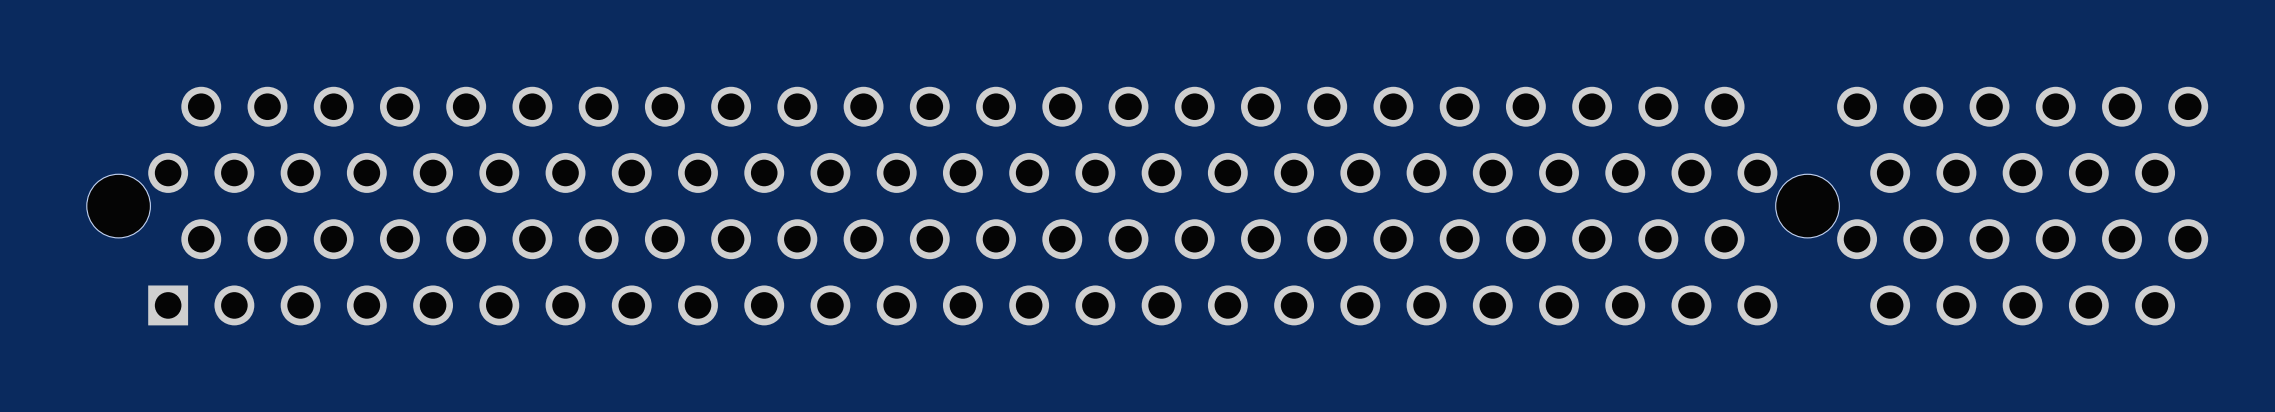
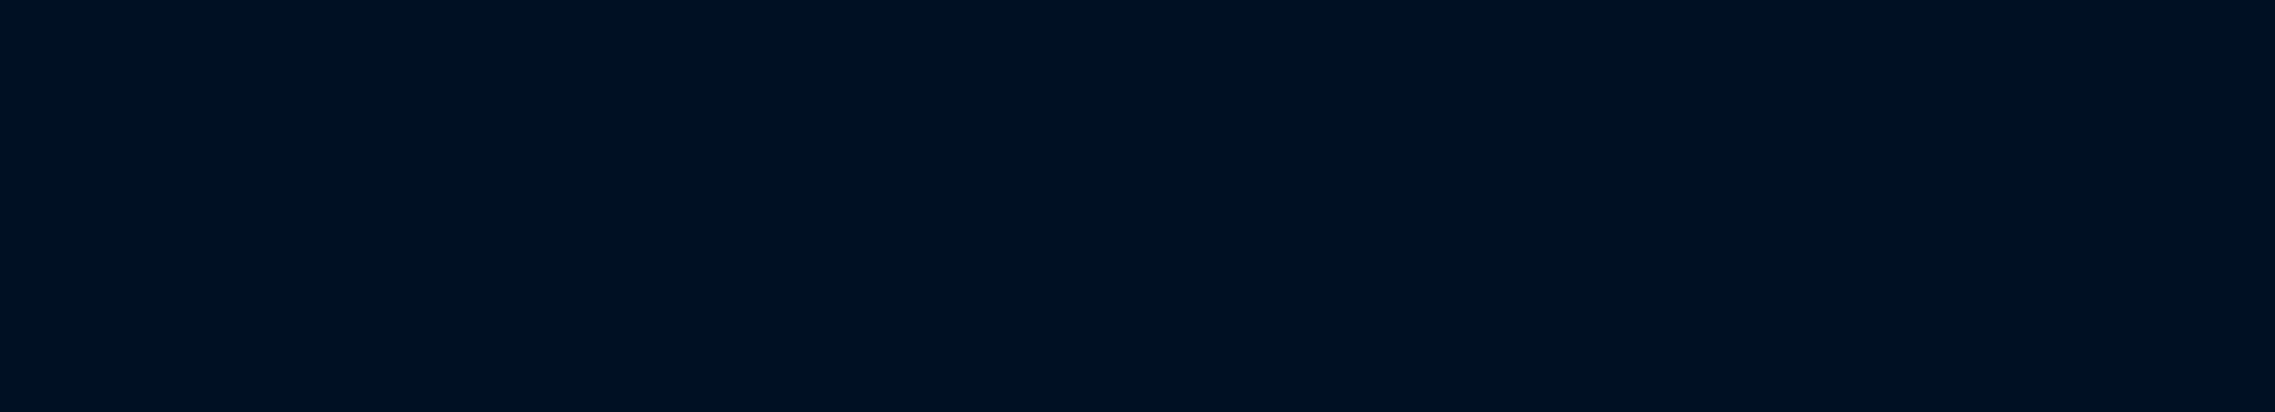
part: (1147, 206) -> none

